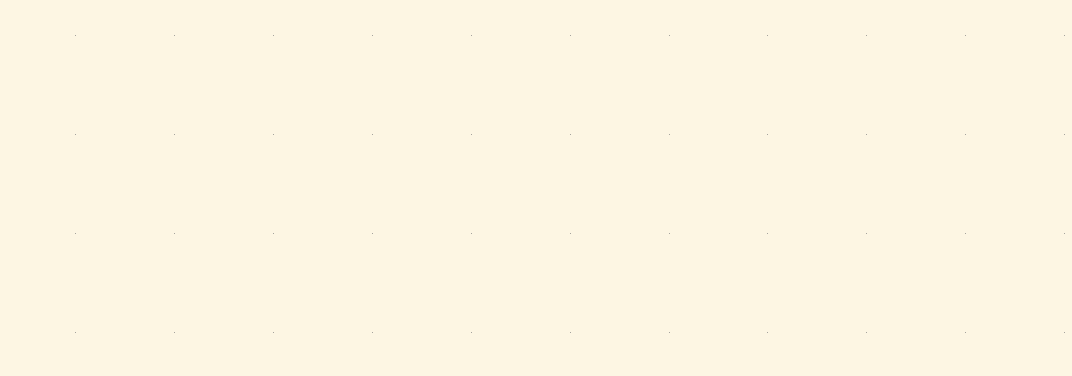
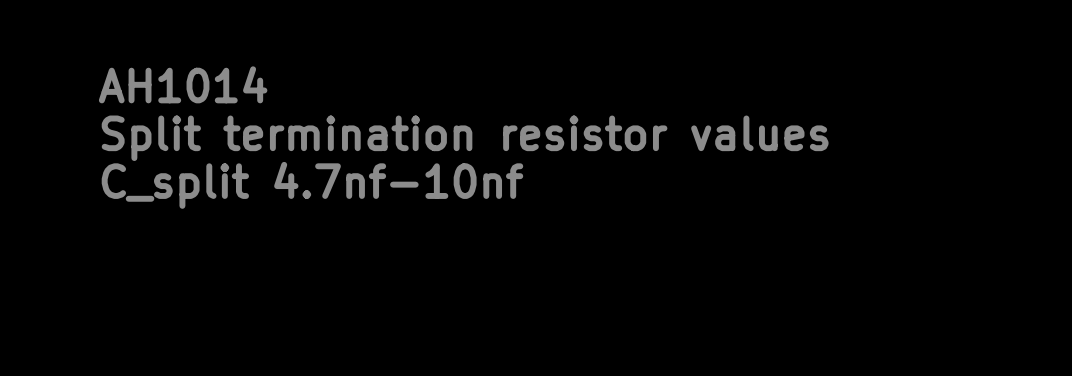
text: none -> AH1014 (183, 84)
text: none -> Split termination resistor values (465, 138)
text: none -> C_split 4.7nf-10nf (312, 185)

